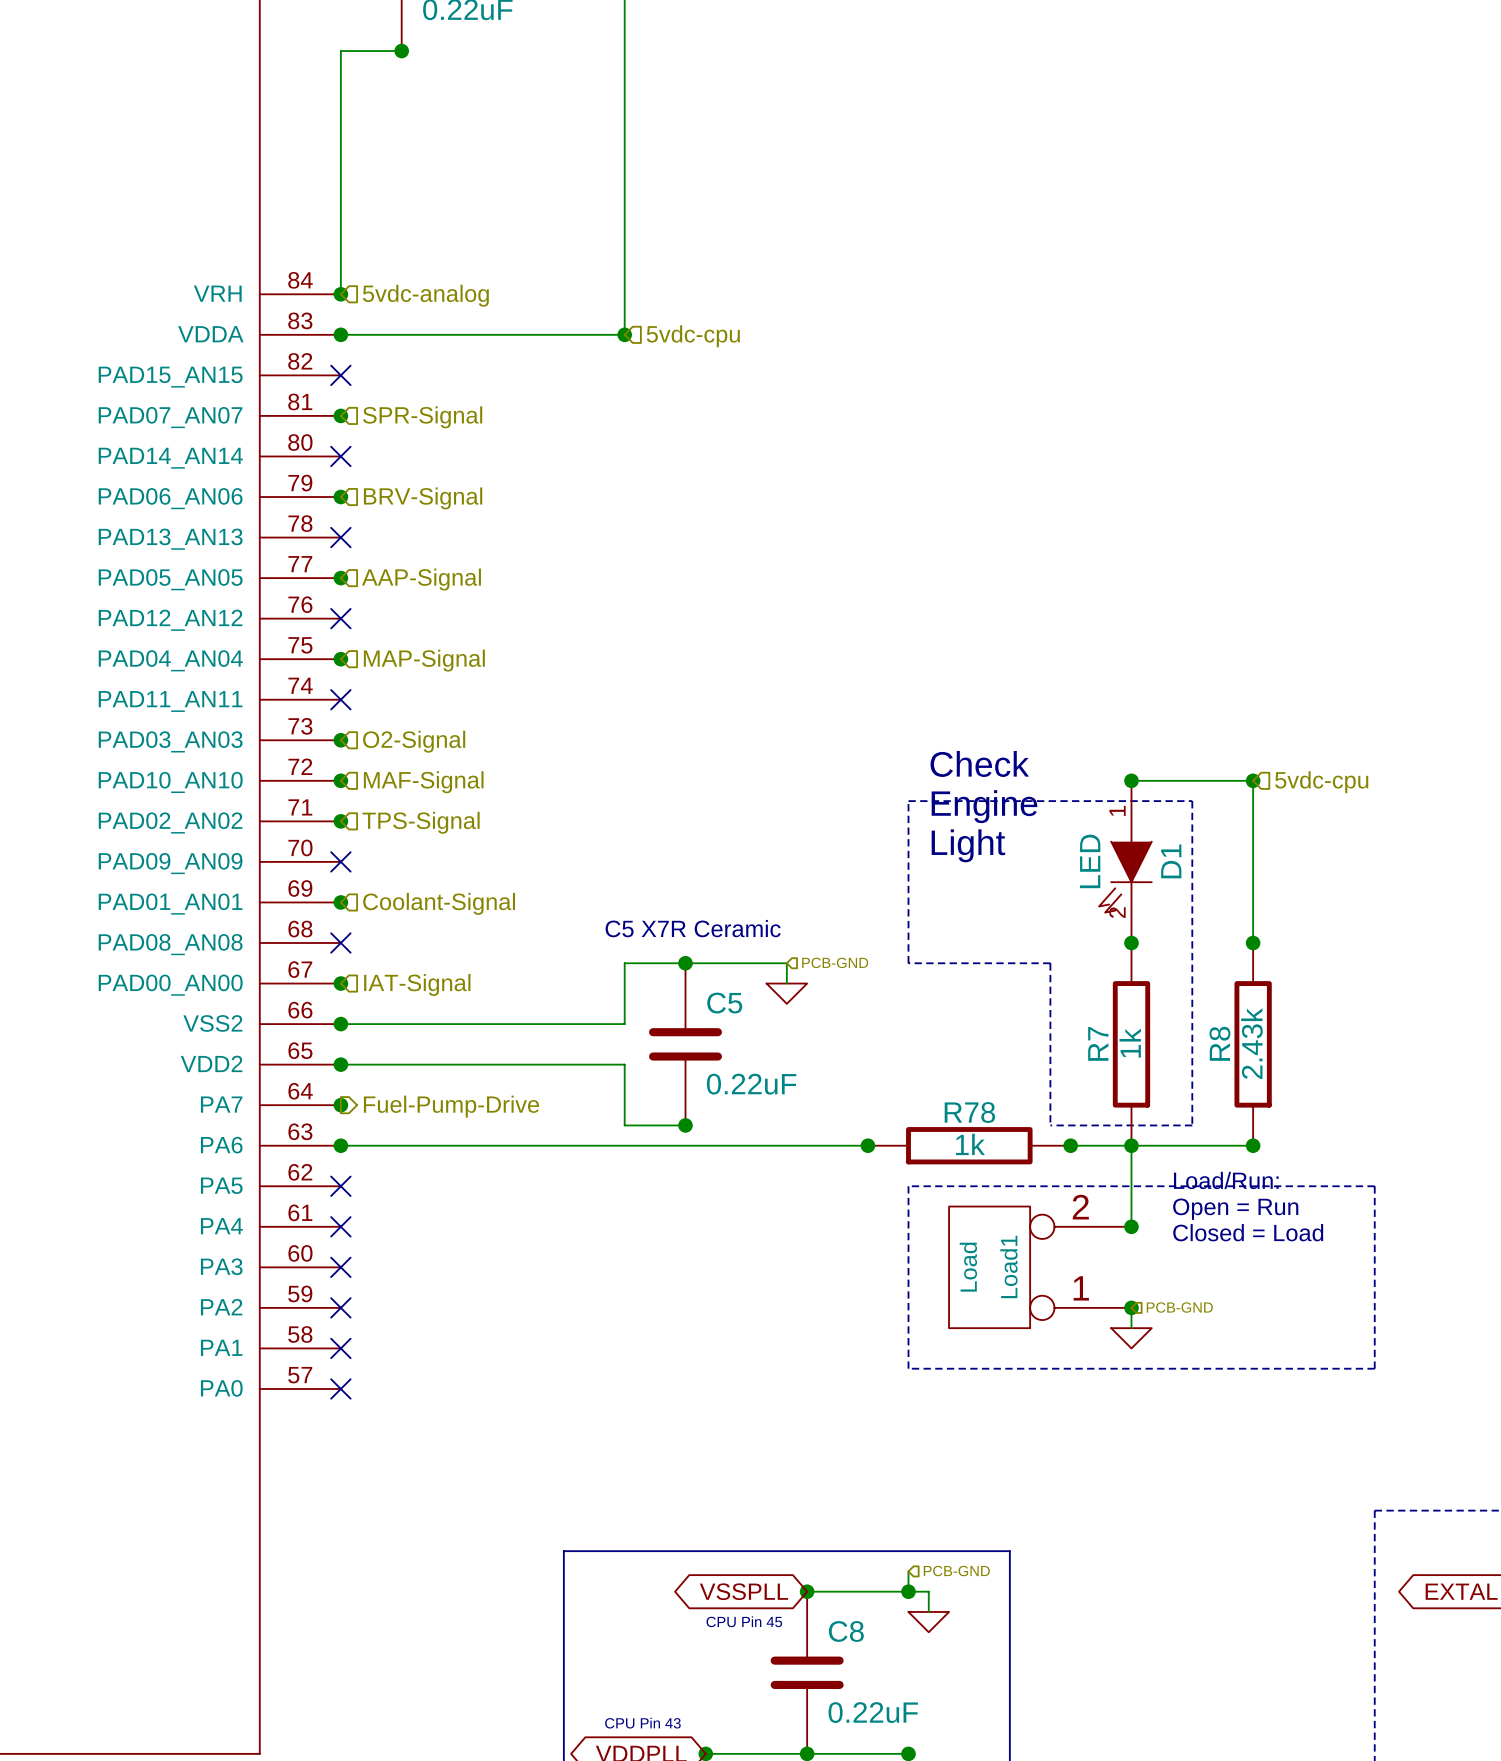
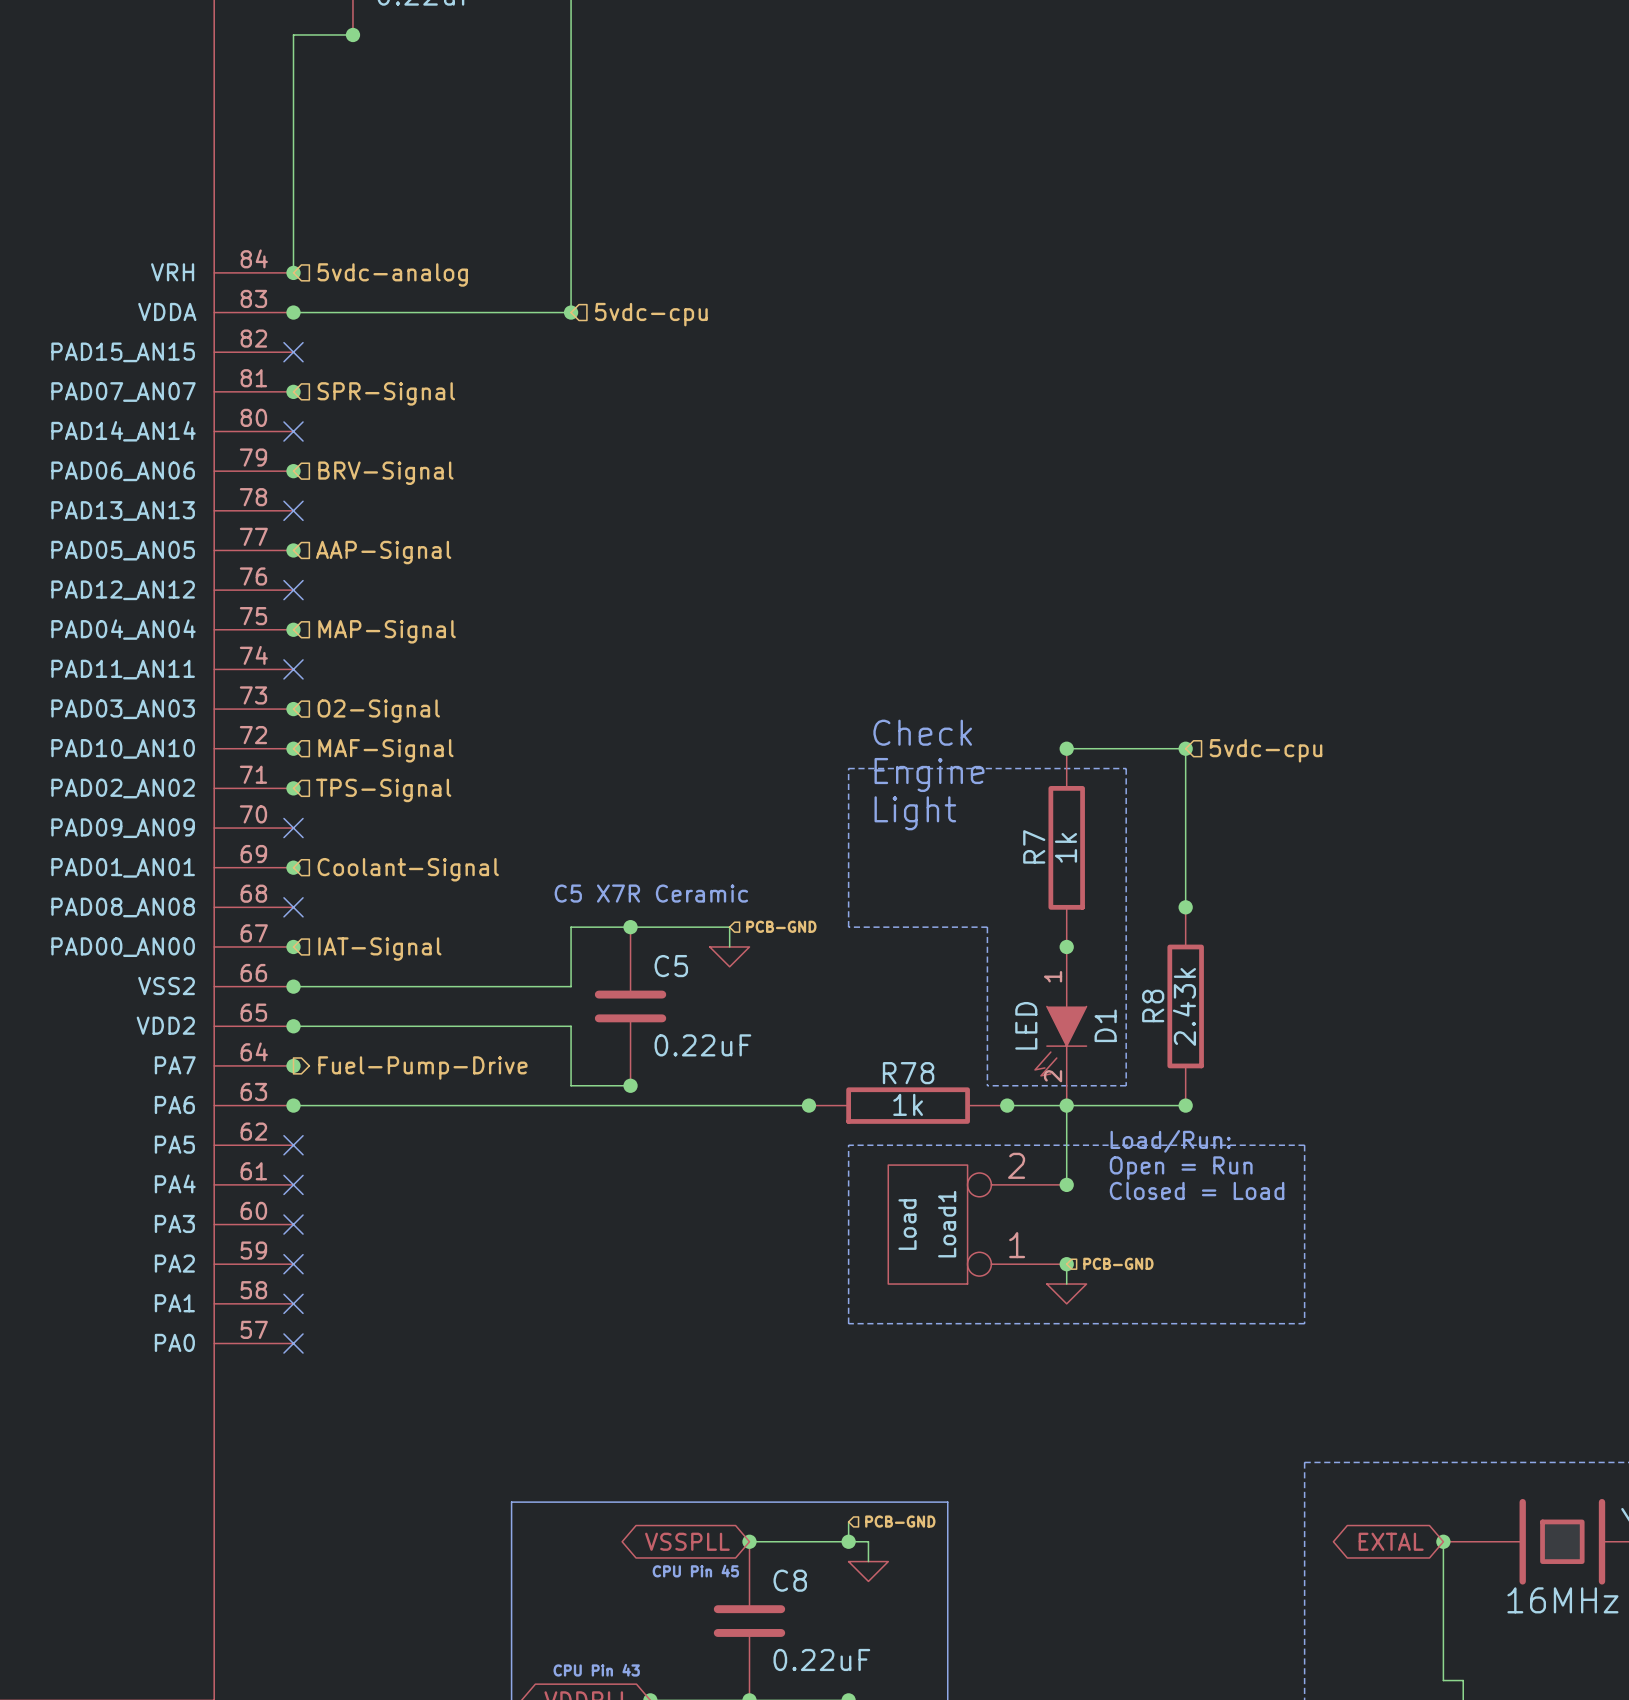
D1 position: (1125, 861) -> (1060, 1026)
junction position: (1131, 943) -> (1066, 946)
R7 position: (1131, 1044) -> (1066, 847)

